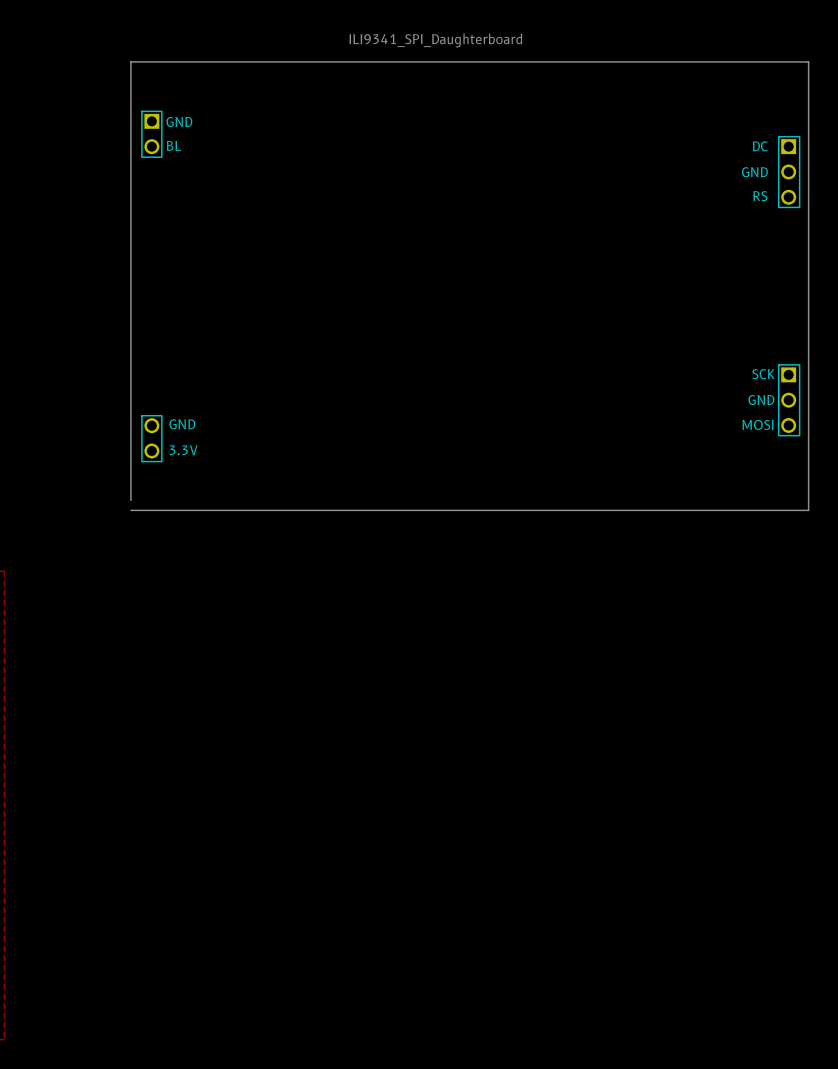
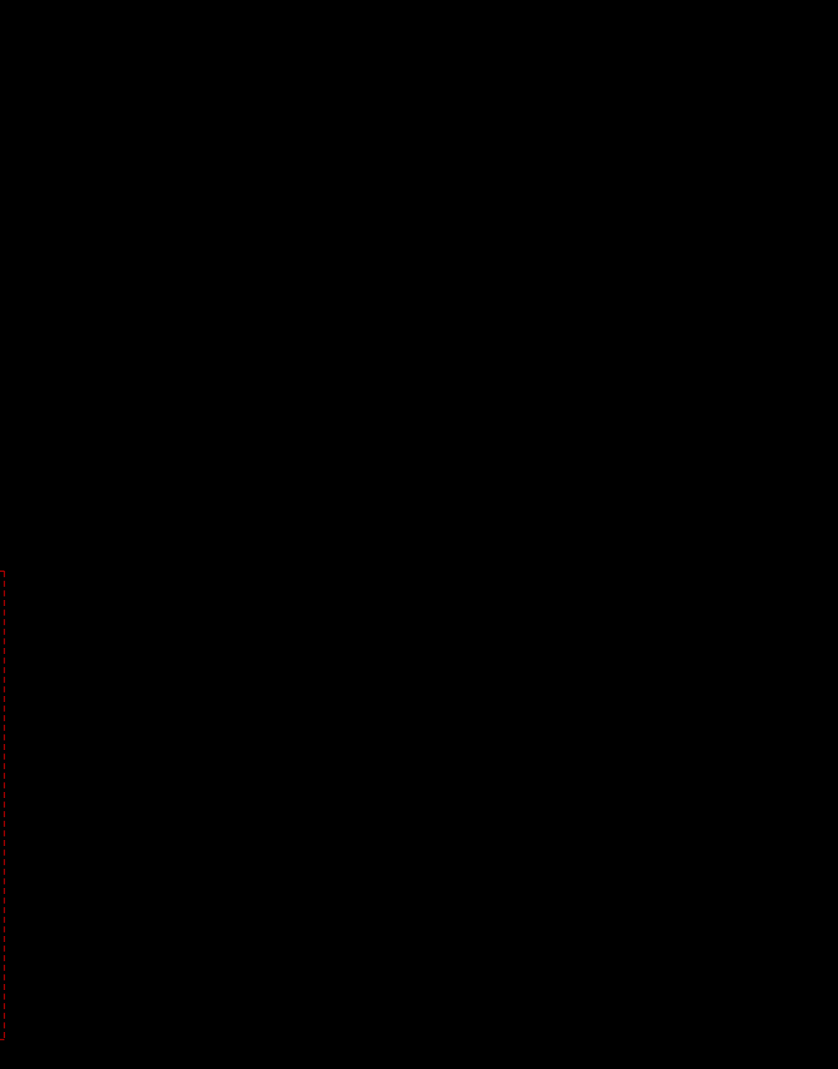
part: ILI9341_SPI_Daughterboard (469, 286) -> none

